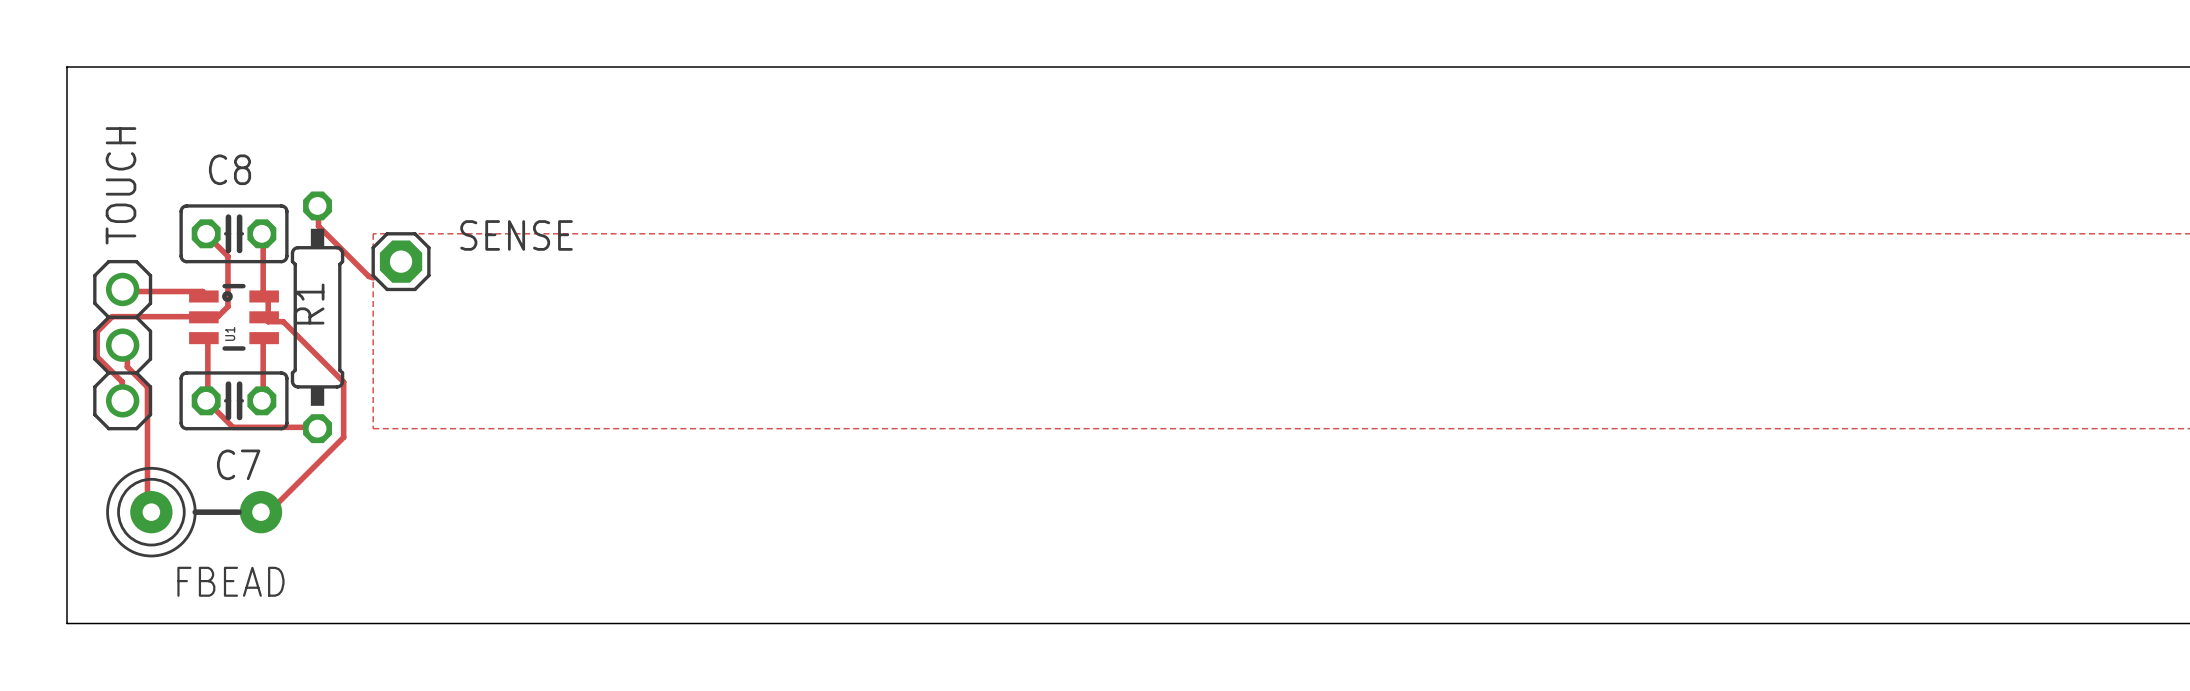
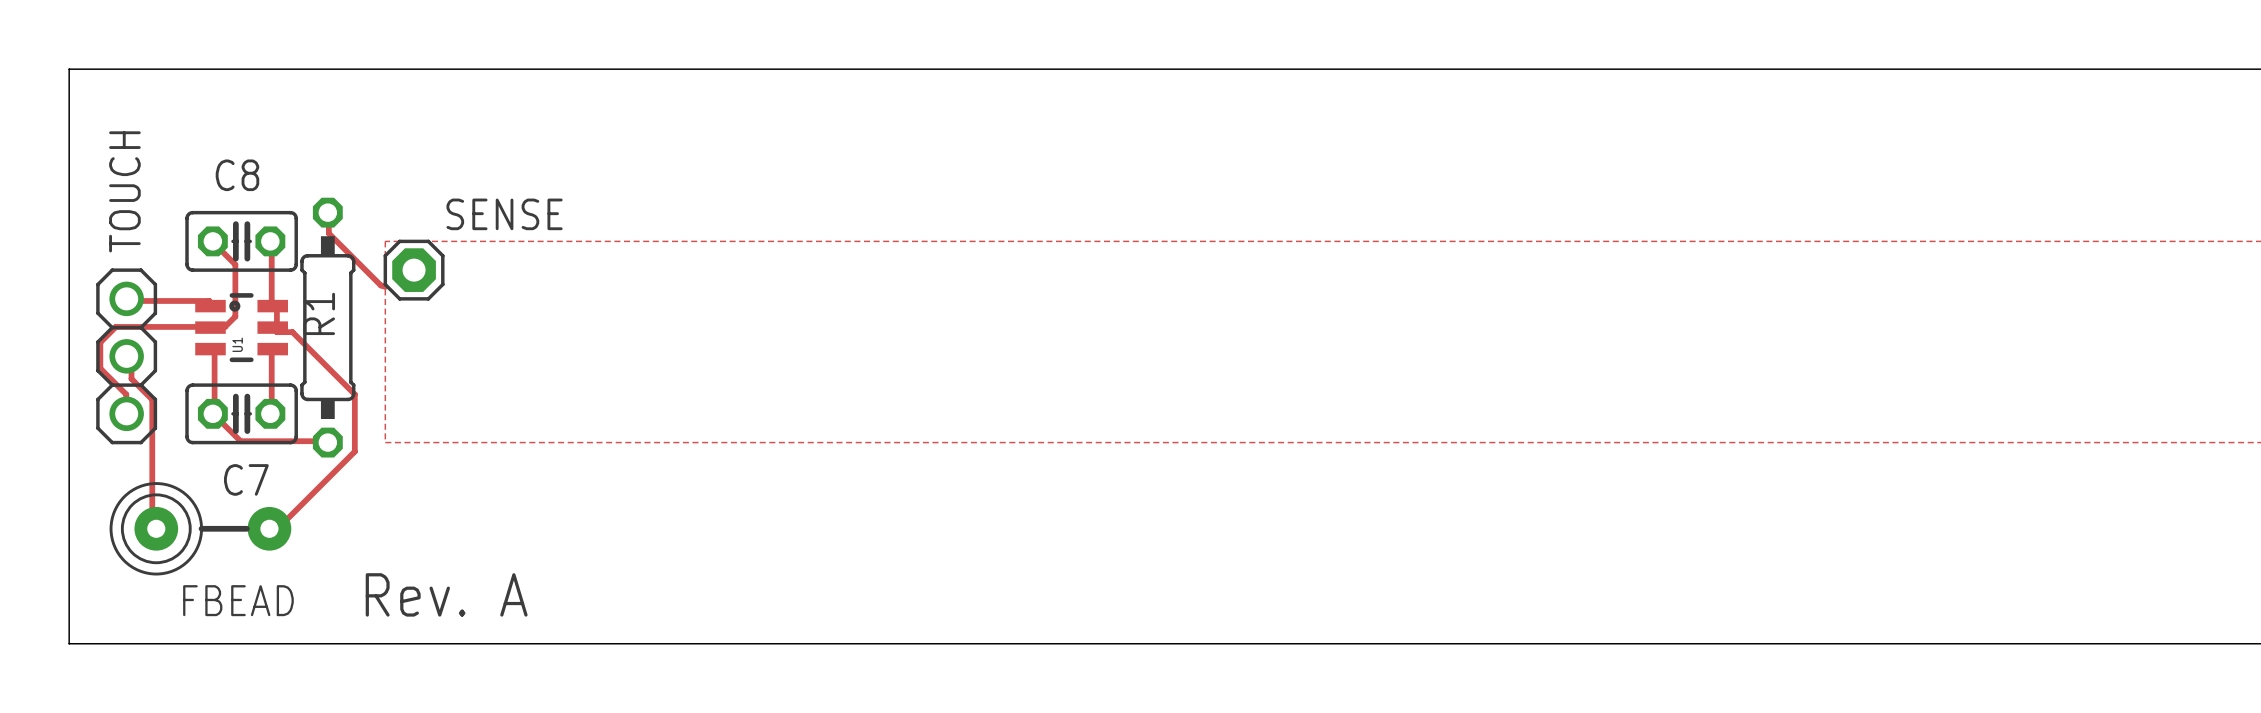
SENSE name position: SENSE (516, 235) -> SENSE (504, 214)
text: none -> Rev. A (446, 594)

